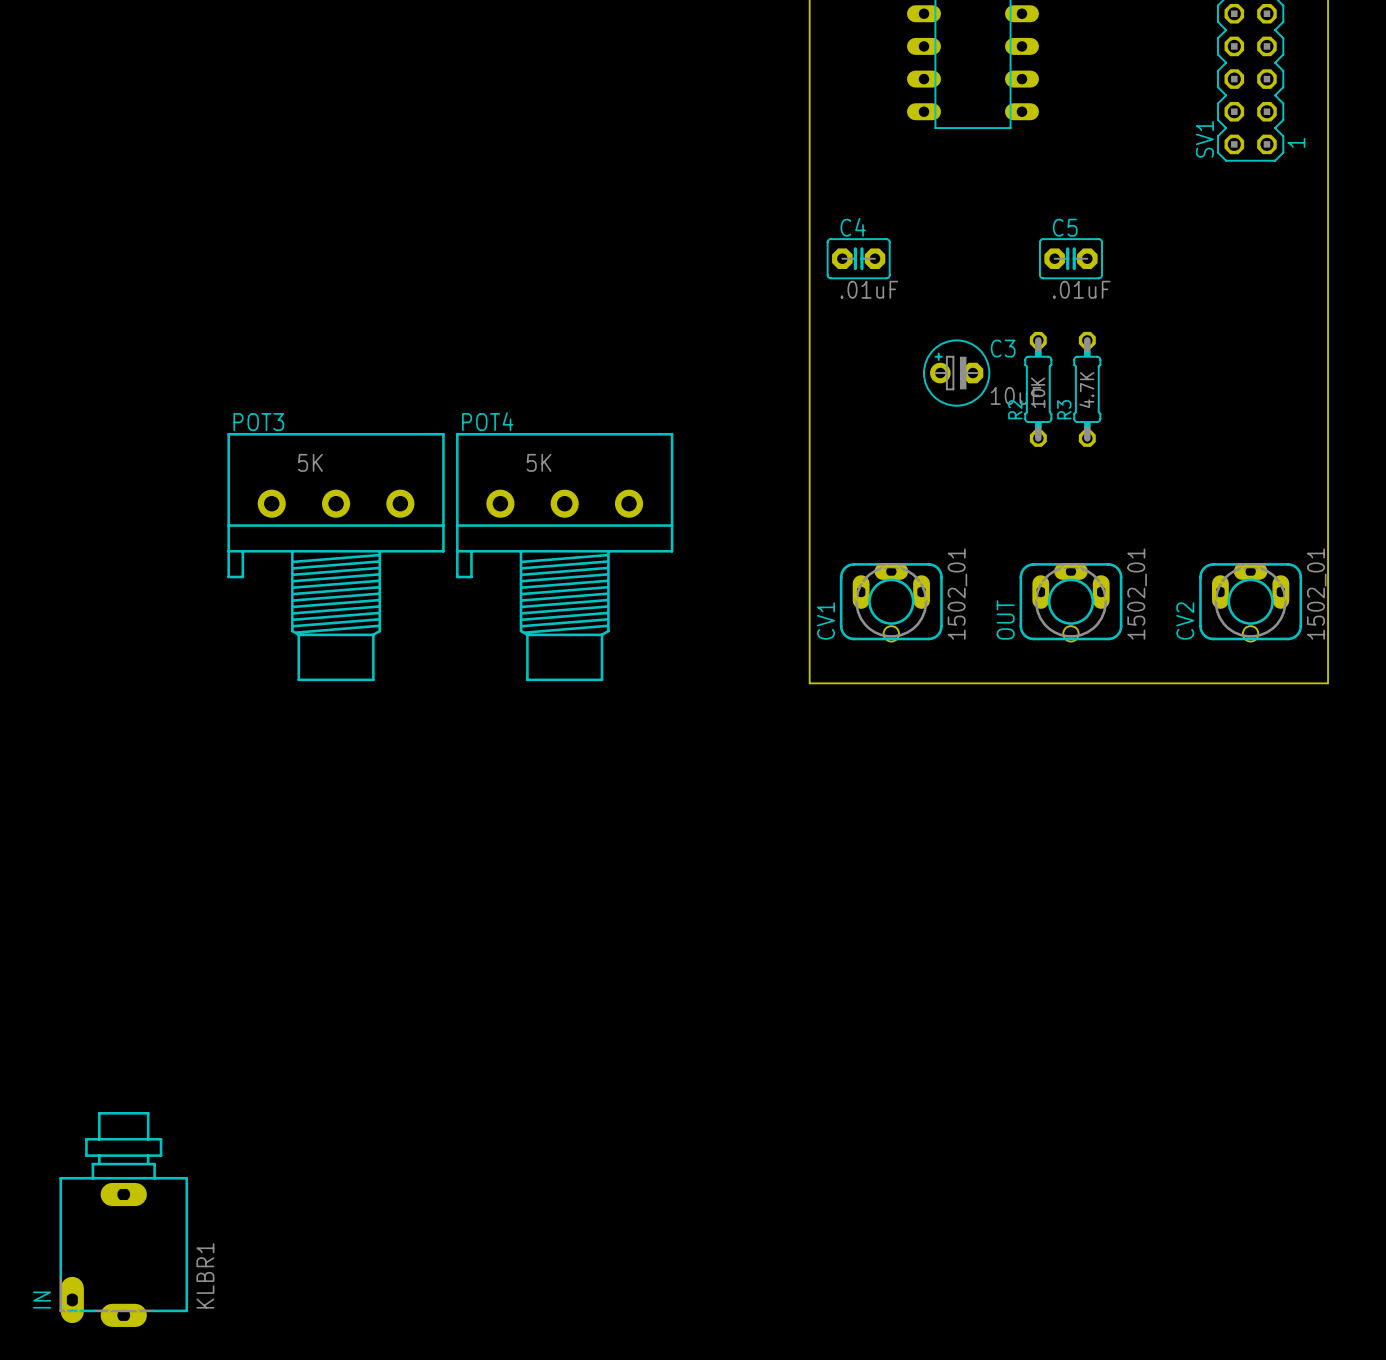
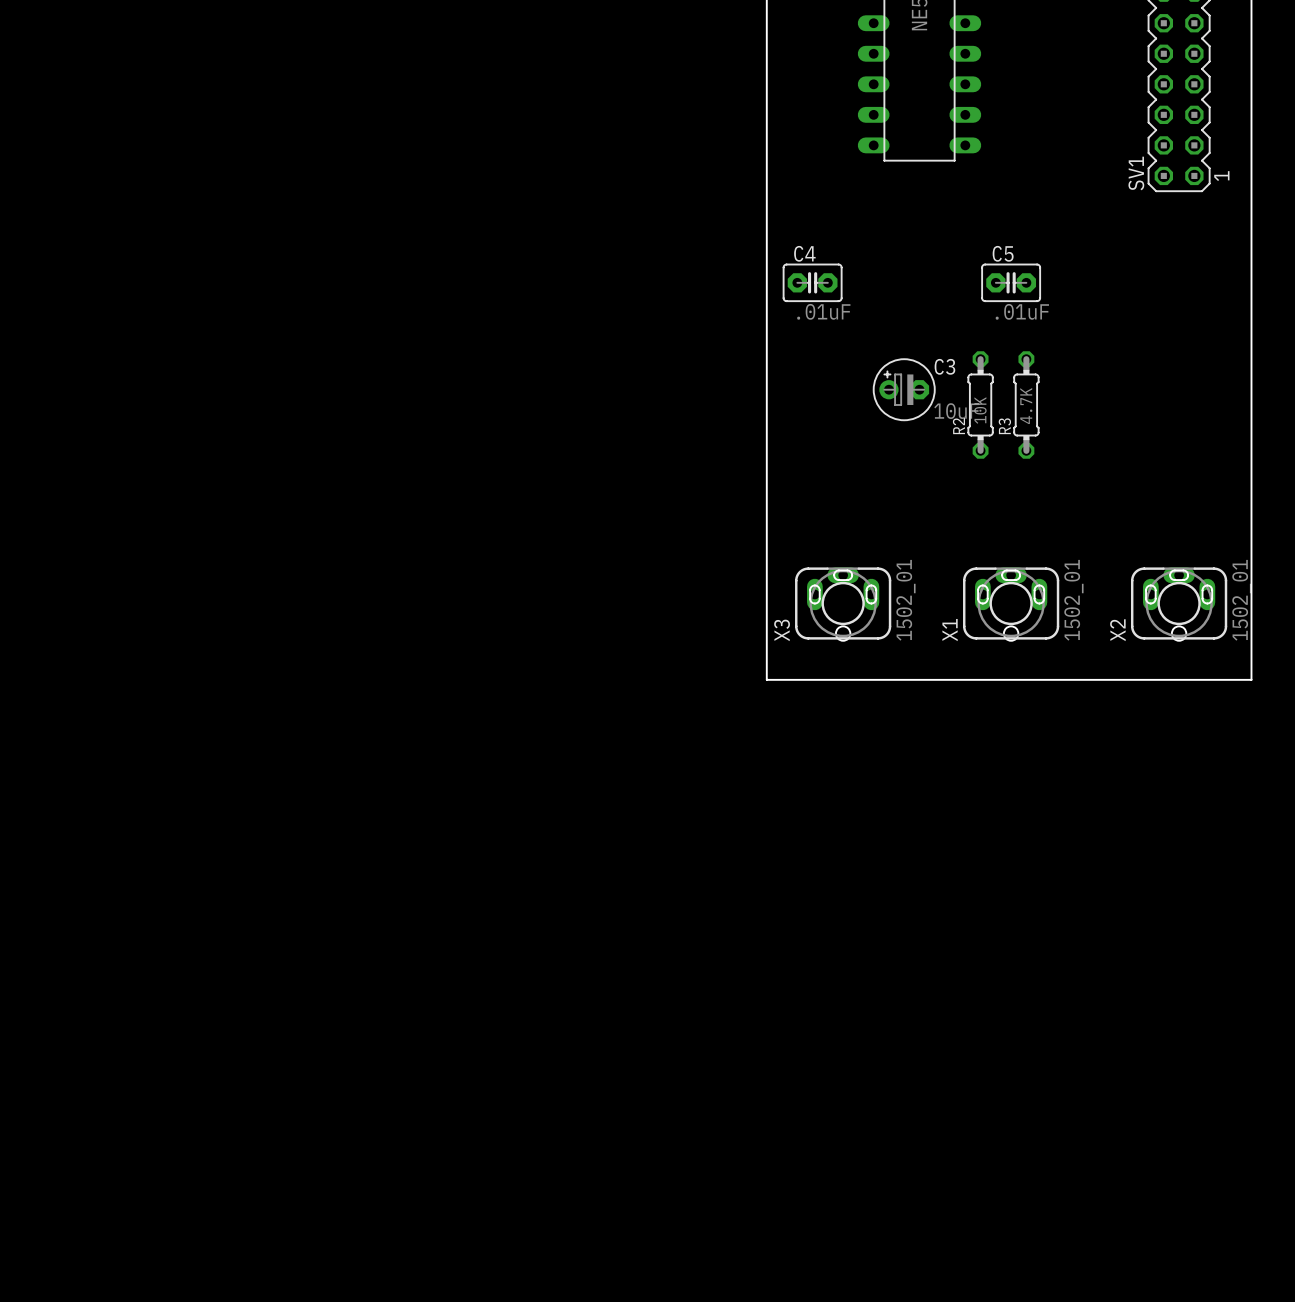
POT3: 5K (336, 557) -> none
POT4: 5K (564, 557) -> none
OUT name: OUT (1005, 619) -> X1 (950, 630)
CV1 name: CV1 (826, 621) -> X3 (782, 630)
CV2 name: CV2 (1185, 621) -> X2 (1117, 630)
IN: KLBR1 (123, 1219) -> none

